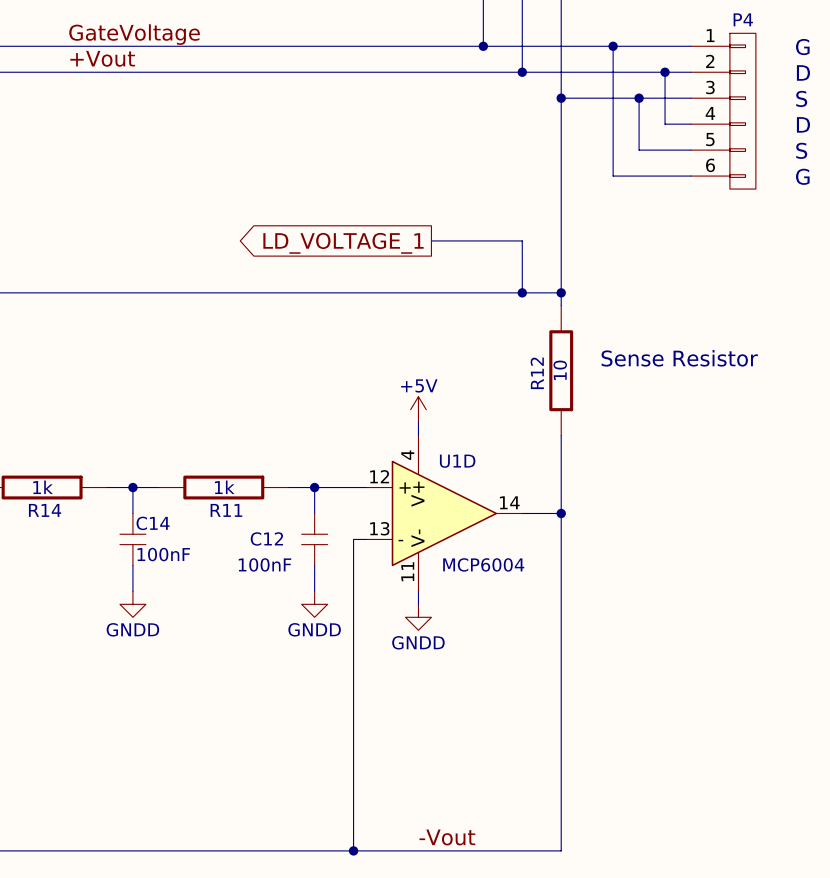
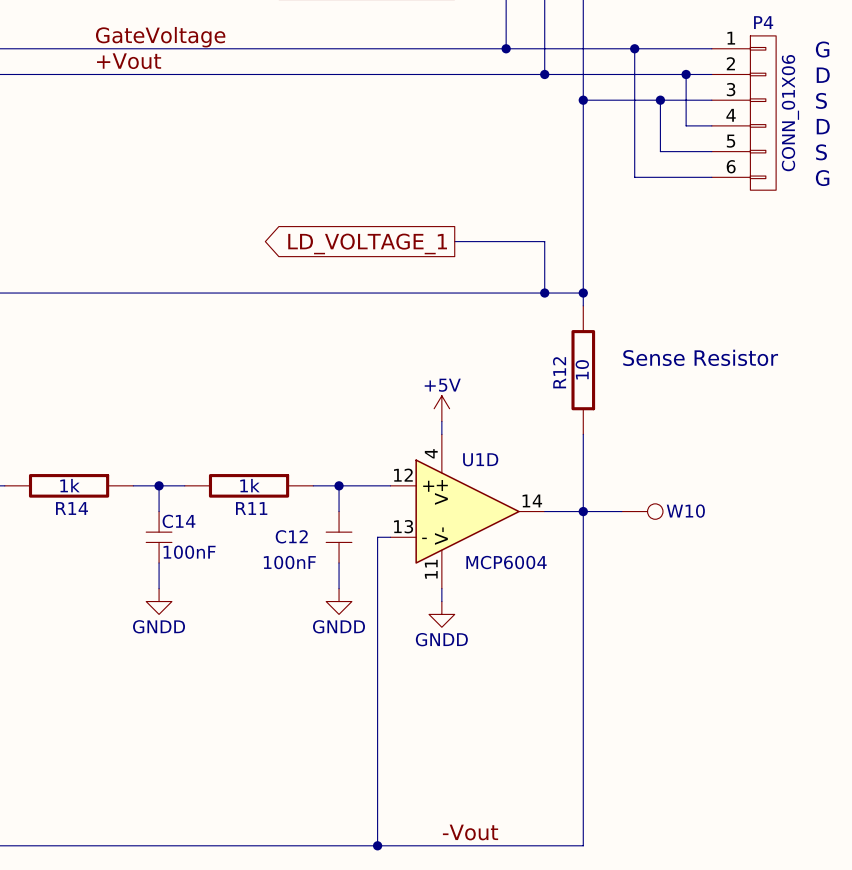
P4 value: none -> CONN_01X06 (790, 113)
wire: none -> (583, 511) (621, 511)
W10: none -> (642, 511)

